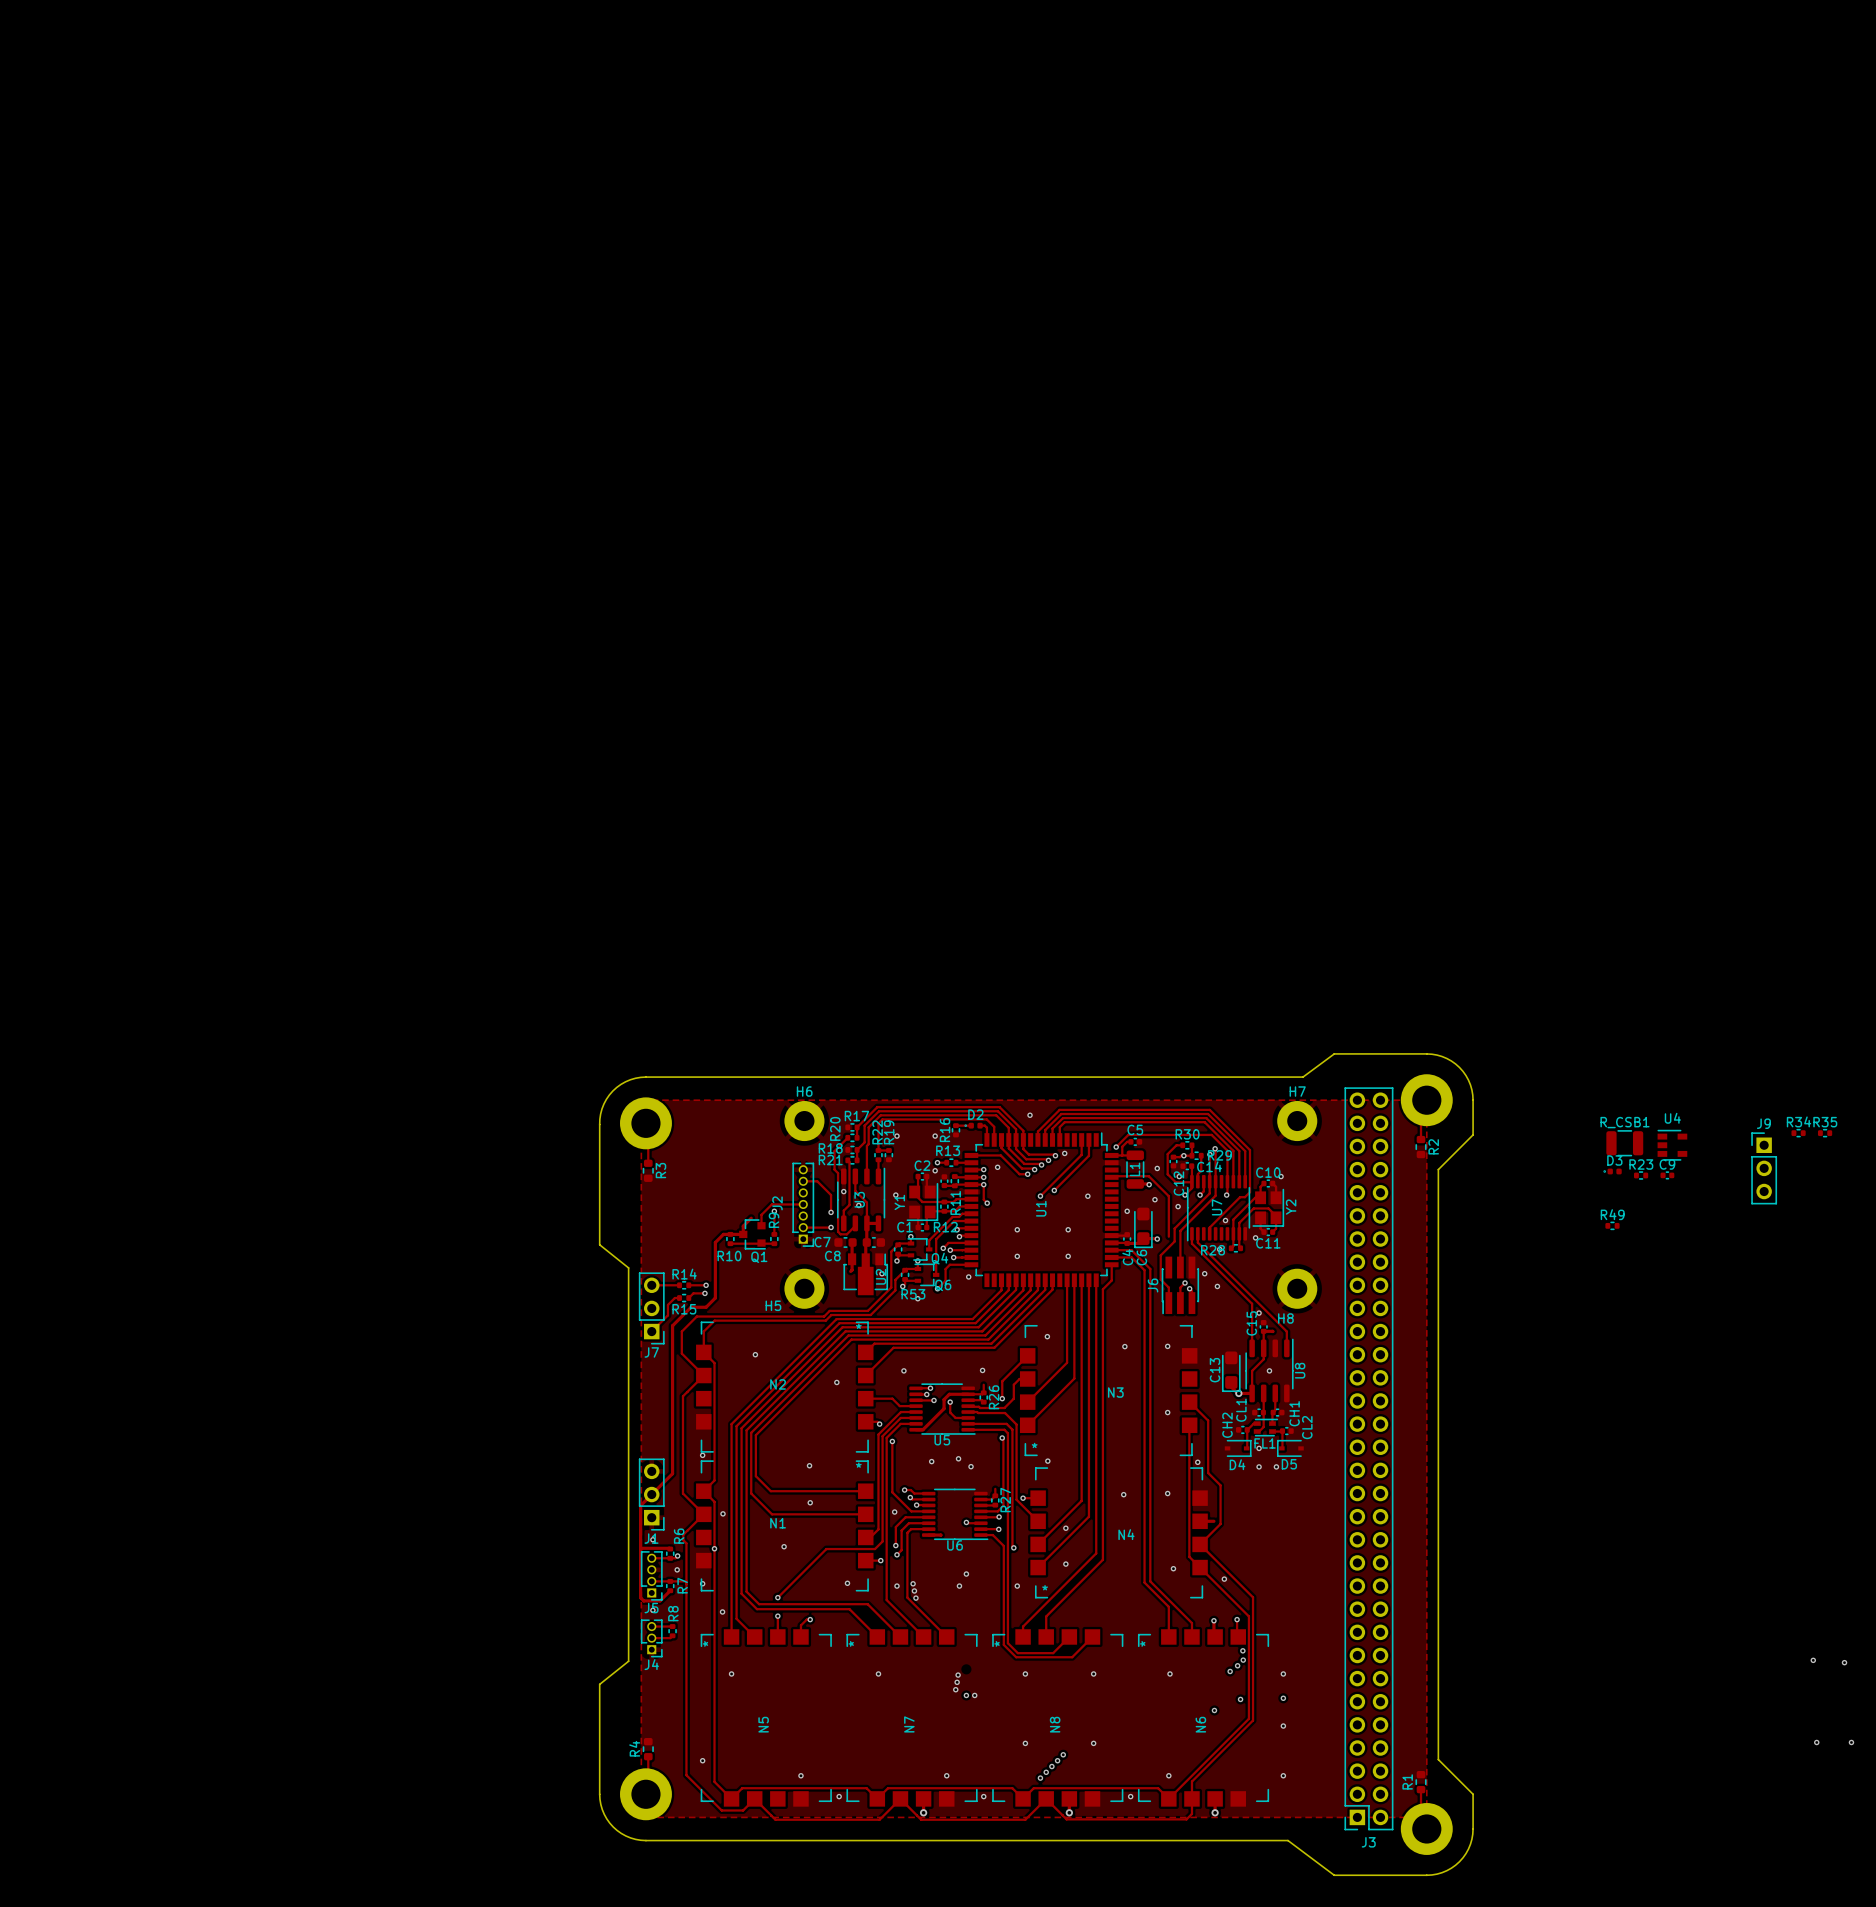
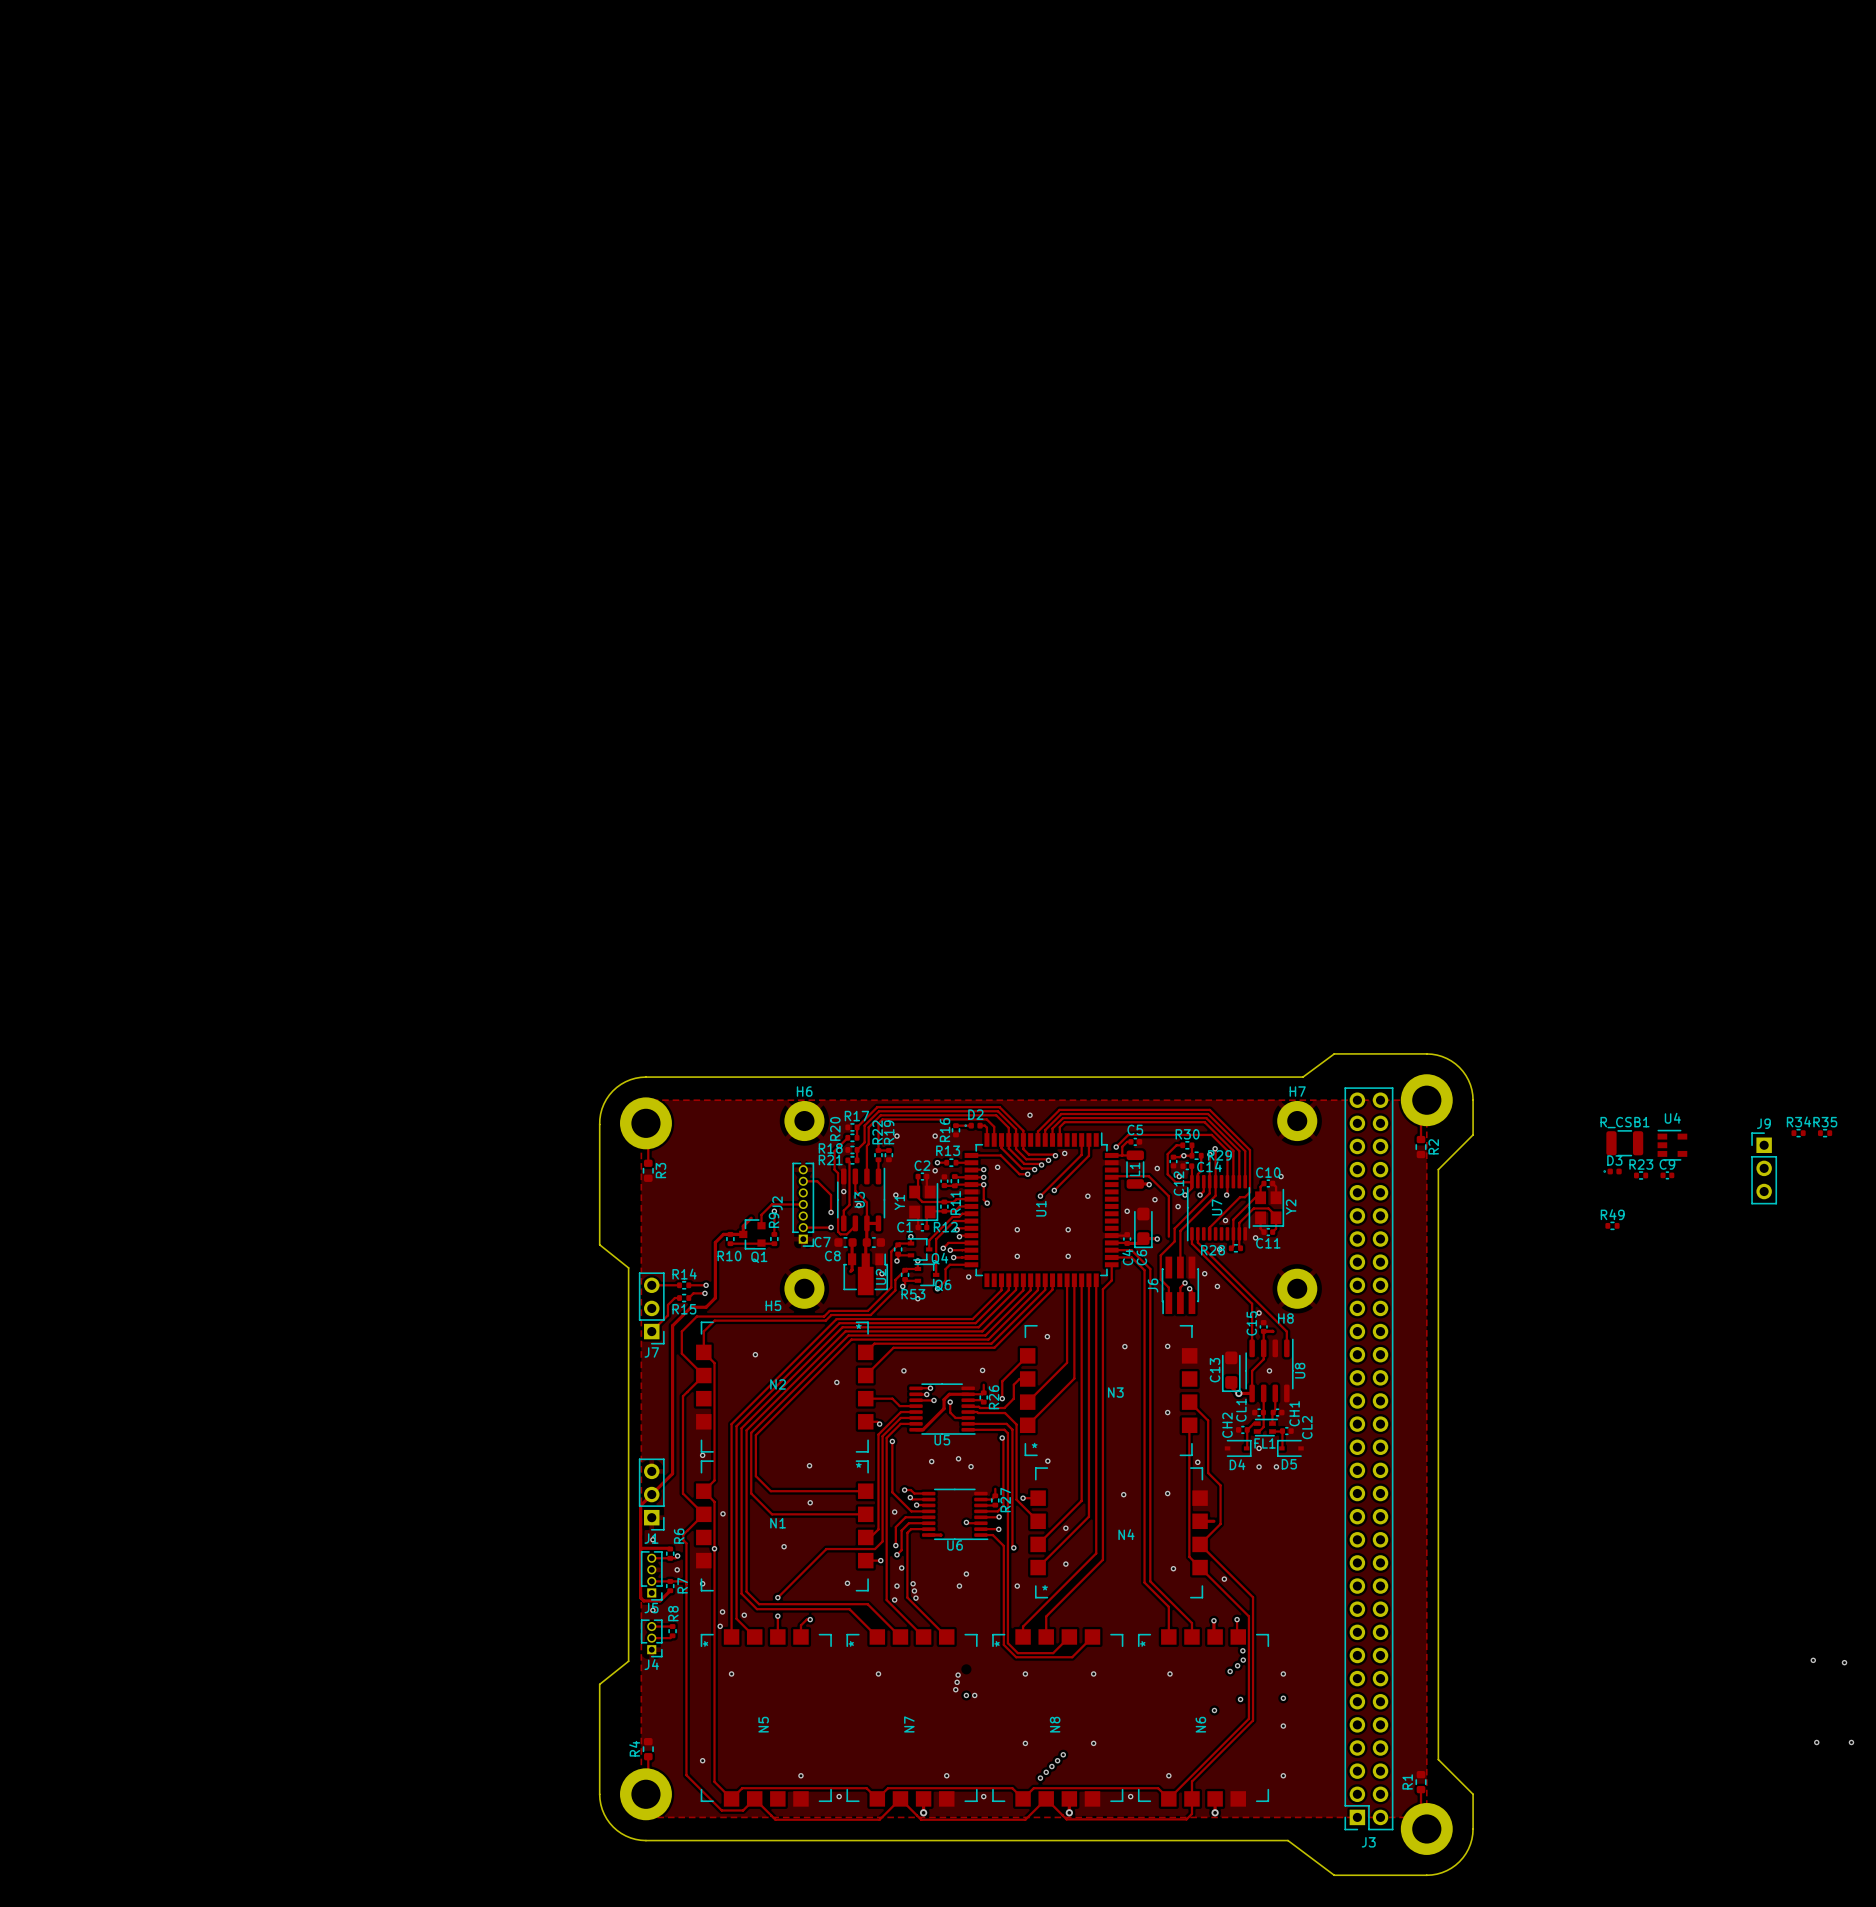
via: none -> (901, 1568)
via: none -> (894, 1599)
via: none -> (744, 1615)
via: none -> (720, 1626)

